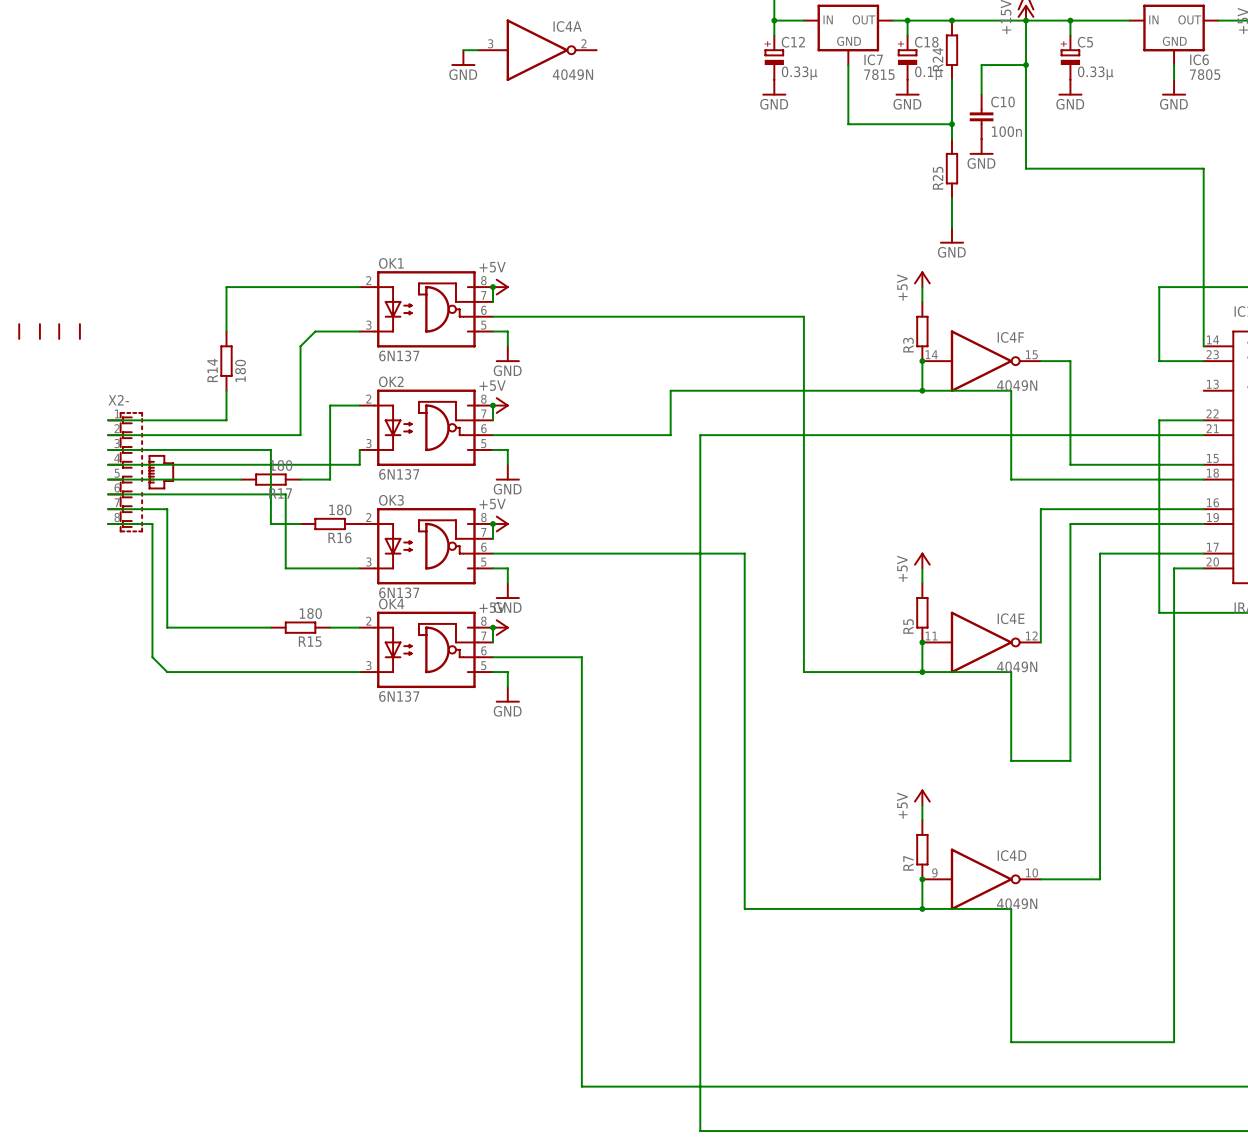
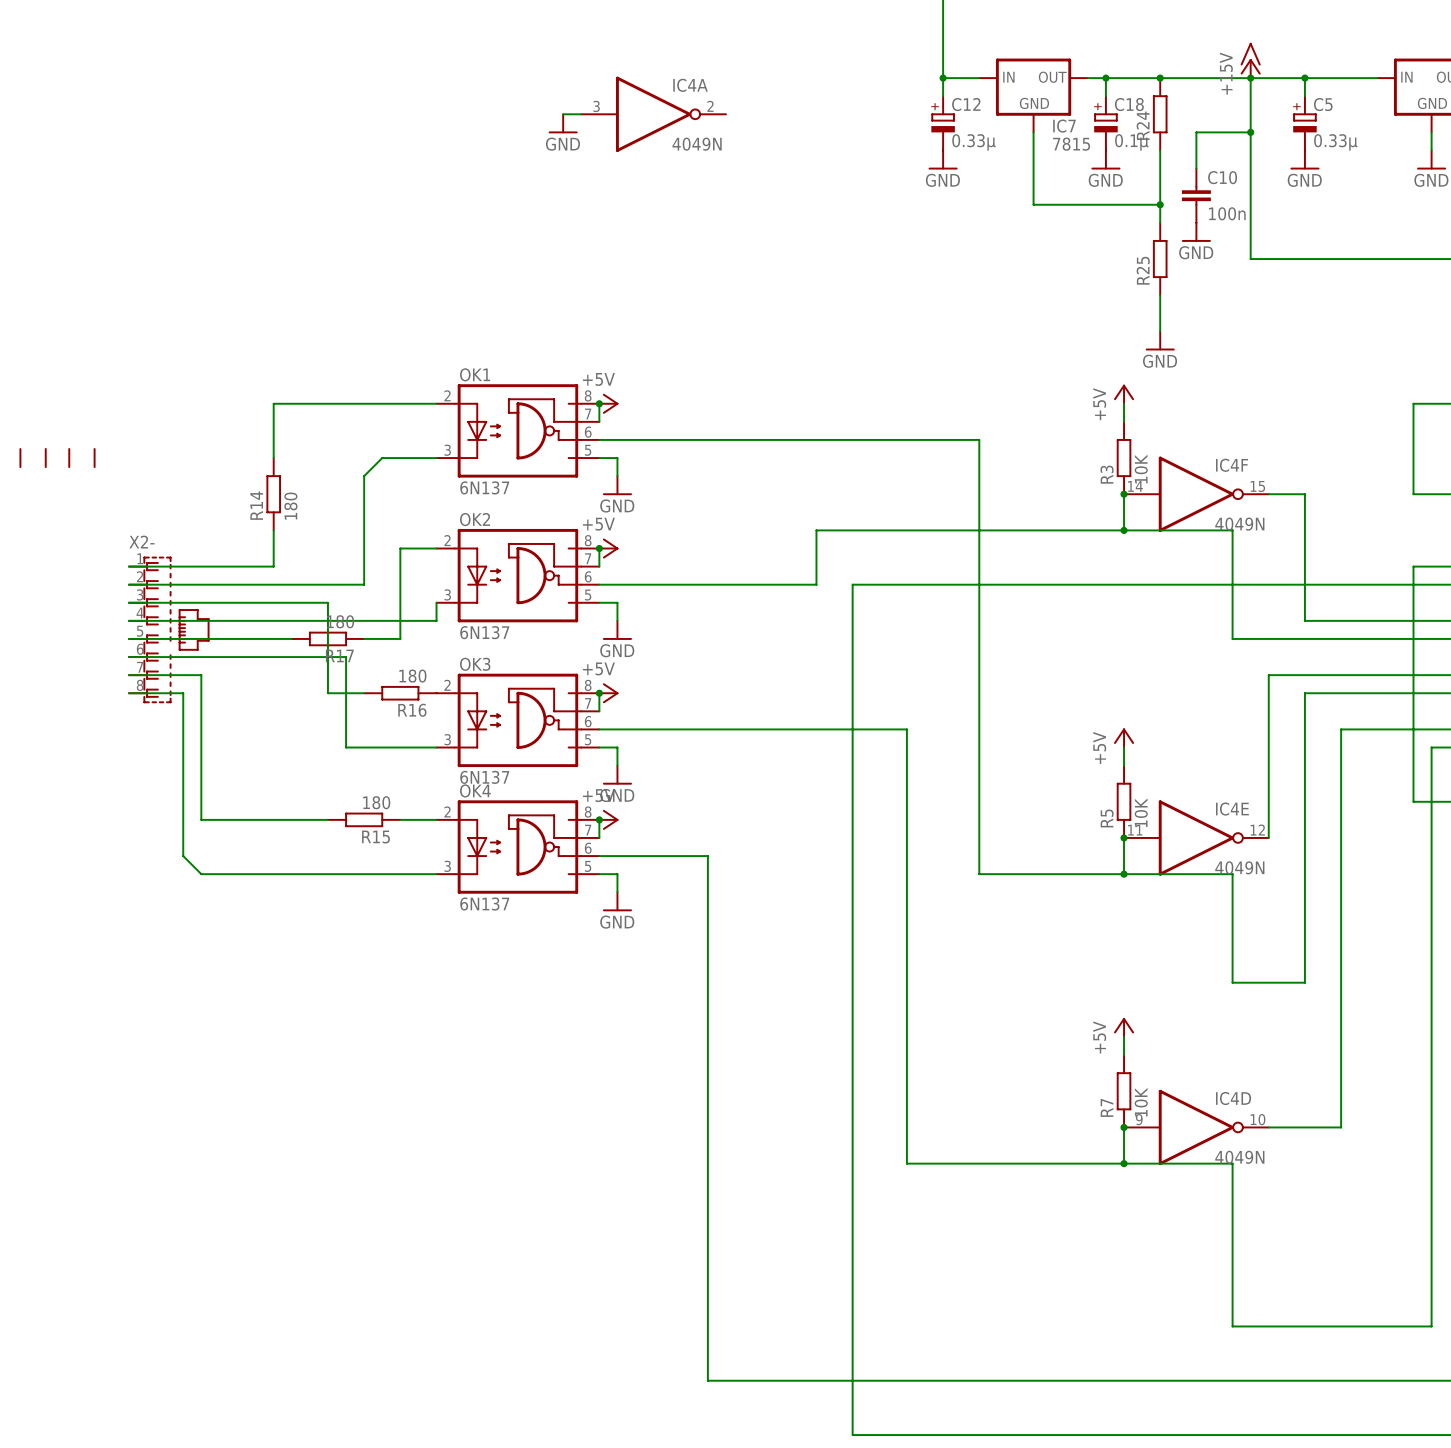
R3 value: none -> 10K (1141, 469)
R5 value: none -> 10K (1141, 812)
R7 value: none -> 10K (1141, 1102)

